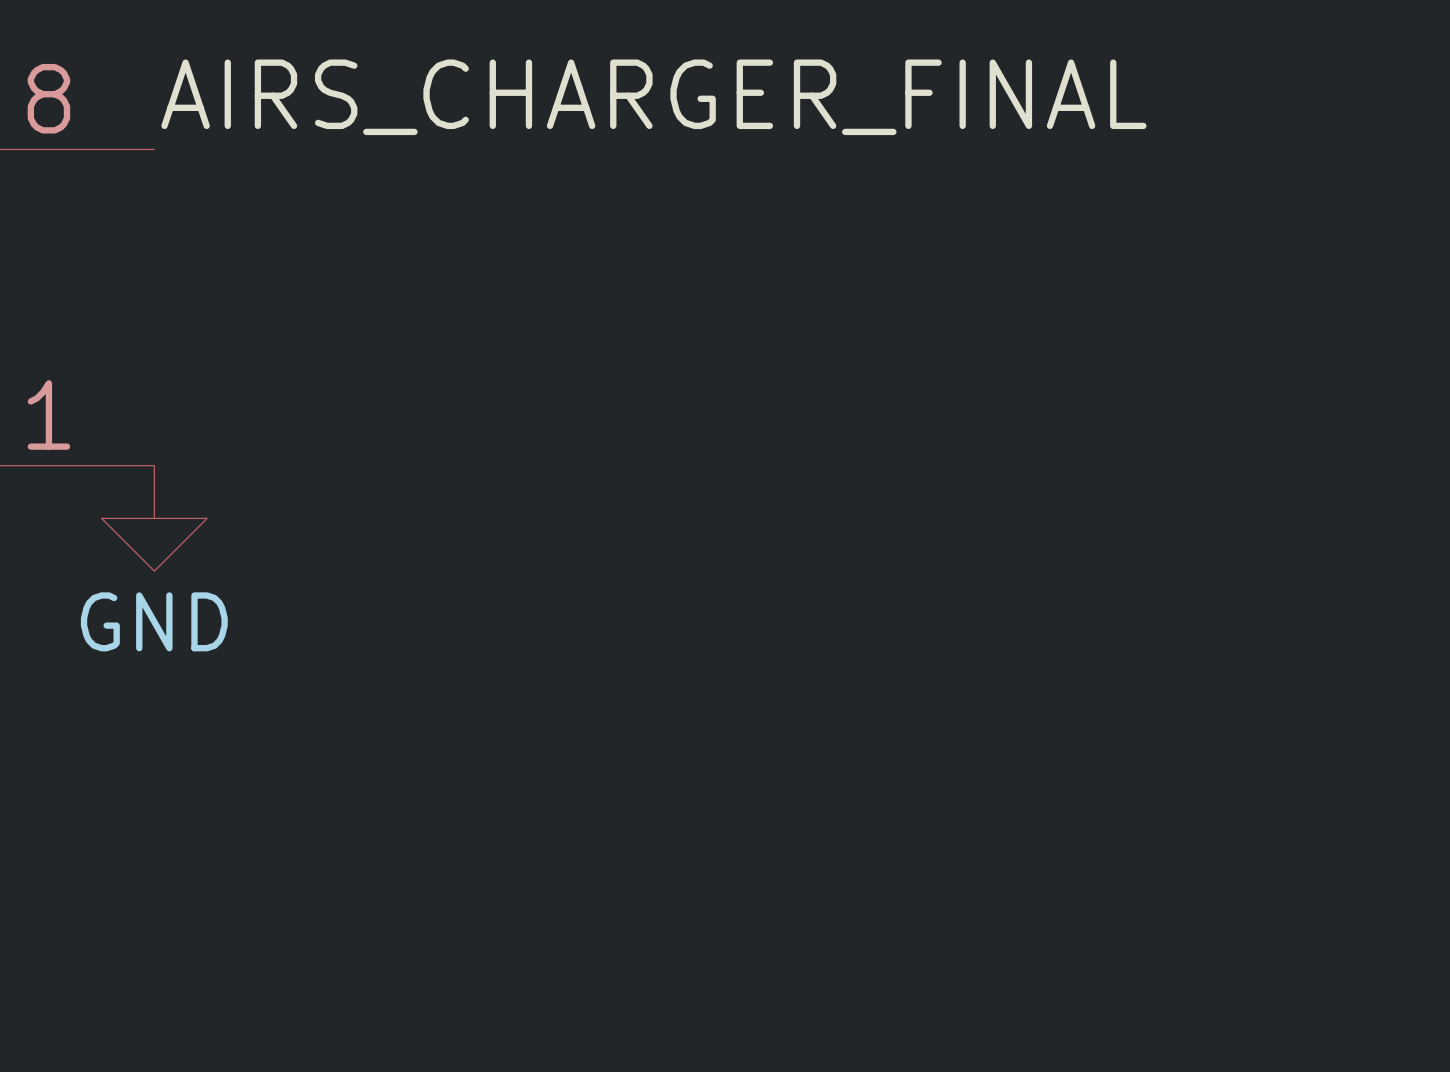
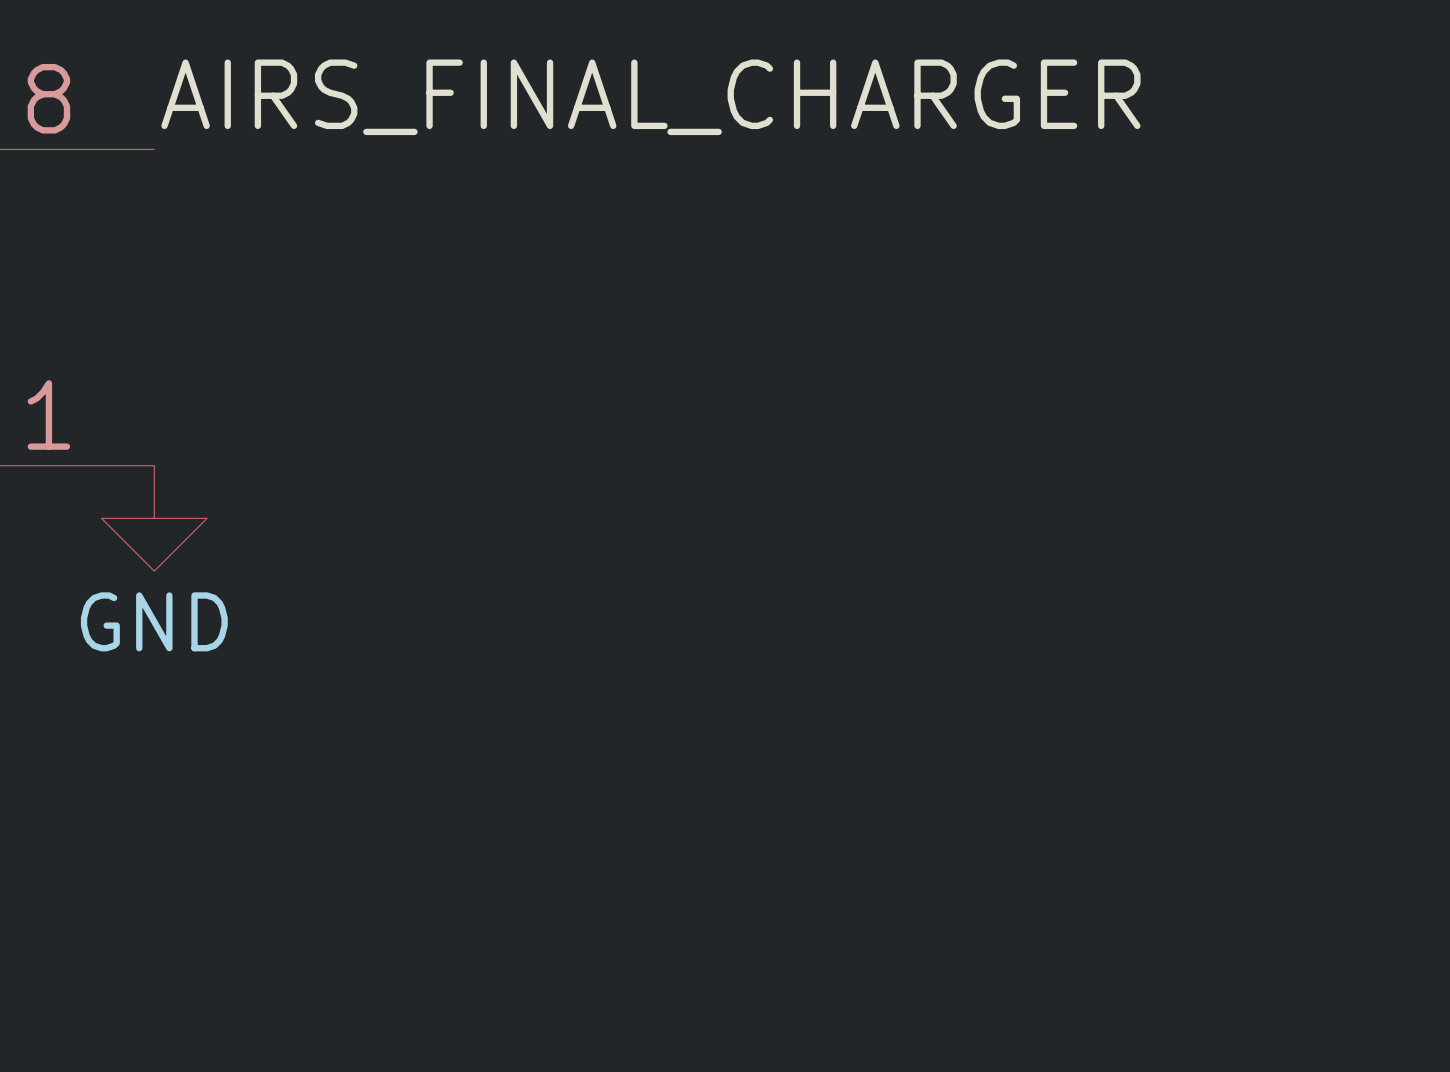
label: AIRS_CHARGER_FINAL (653, 97) -> AIRS_FINAL_CHARGER (650, 97)

